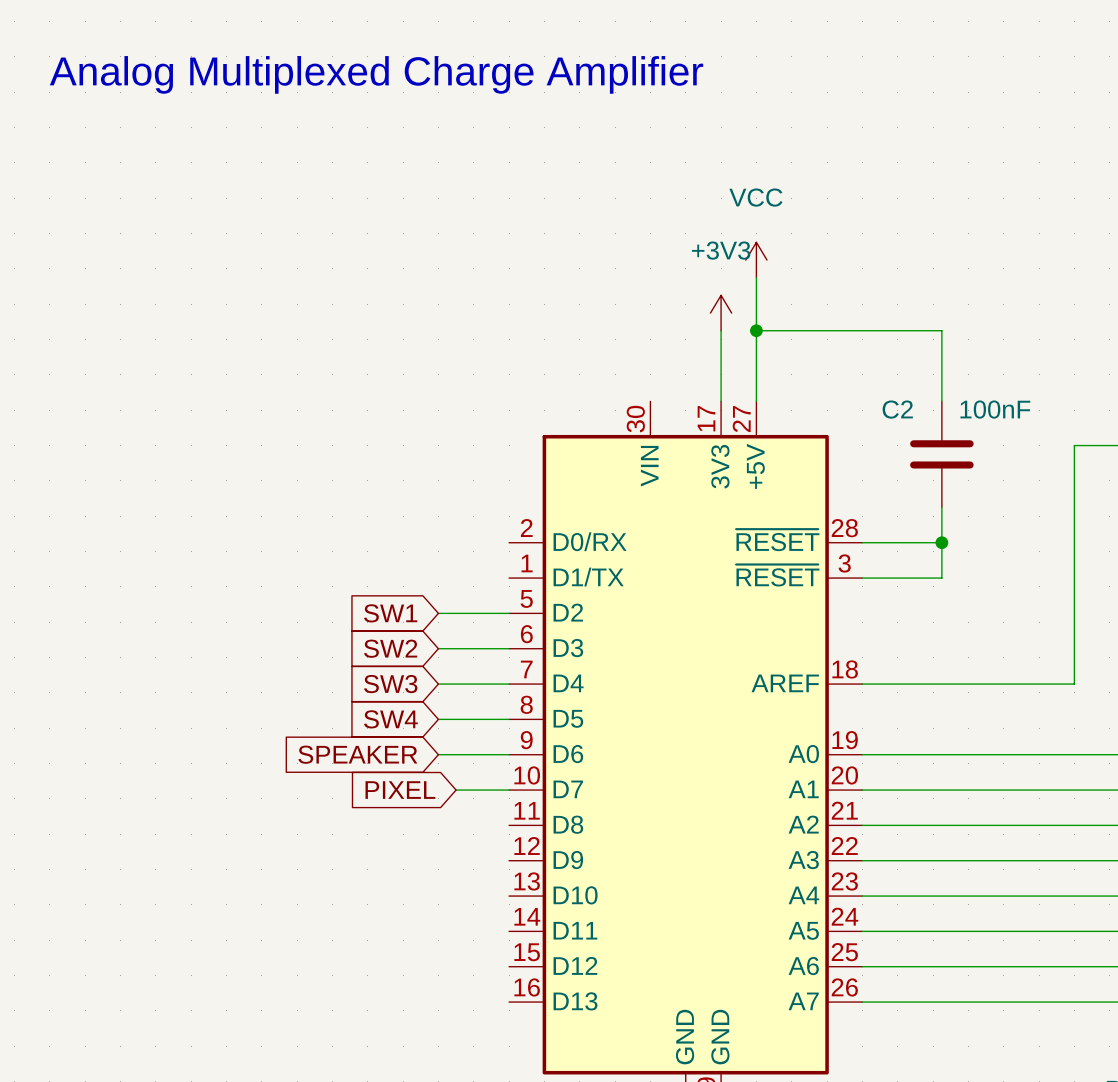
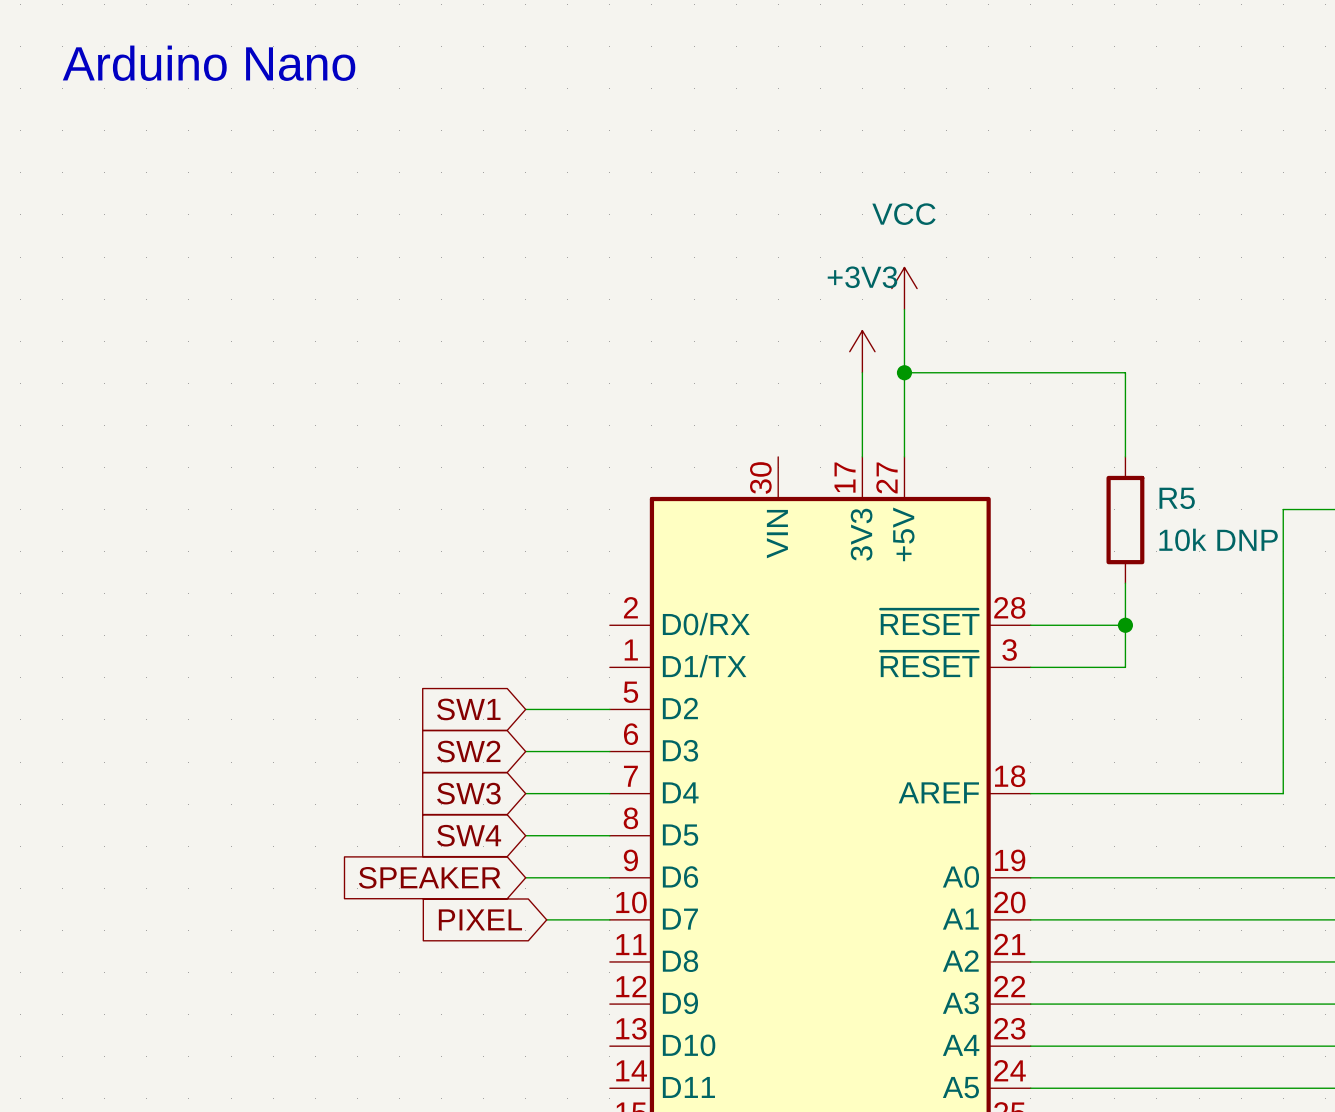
text: Analog Multiplexed Charge Amplifier (376, 74) -> Arduino Nano (209, 63)
C2: 100nF (941, 454) -> none
R5: none -> 10k DNP (1125, 520)

